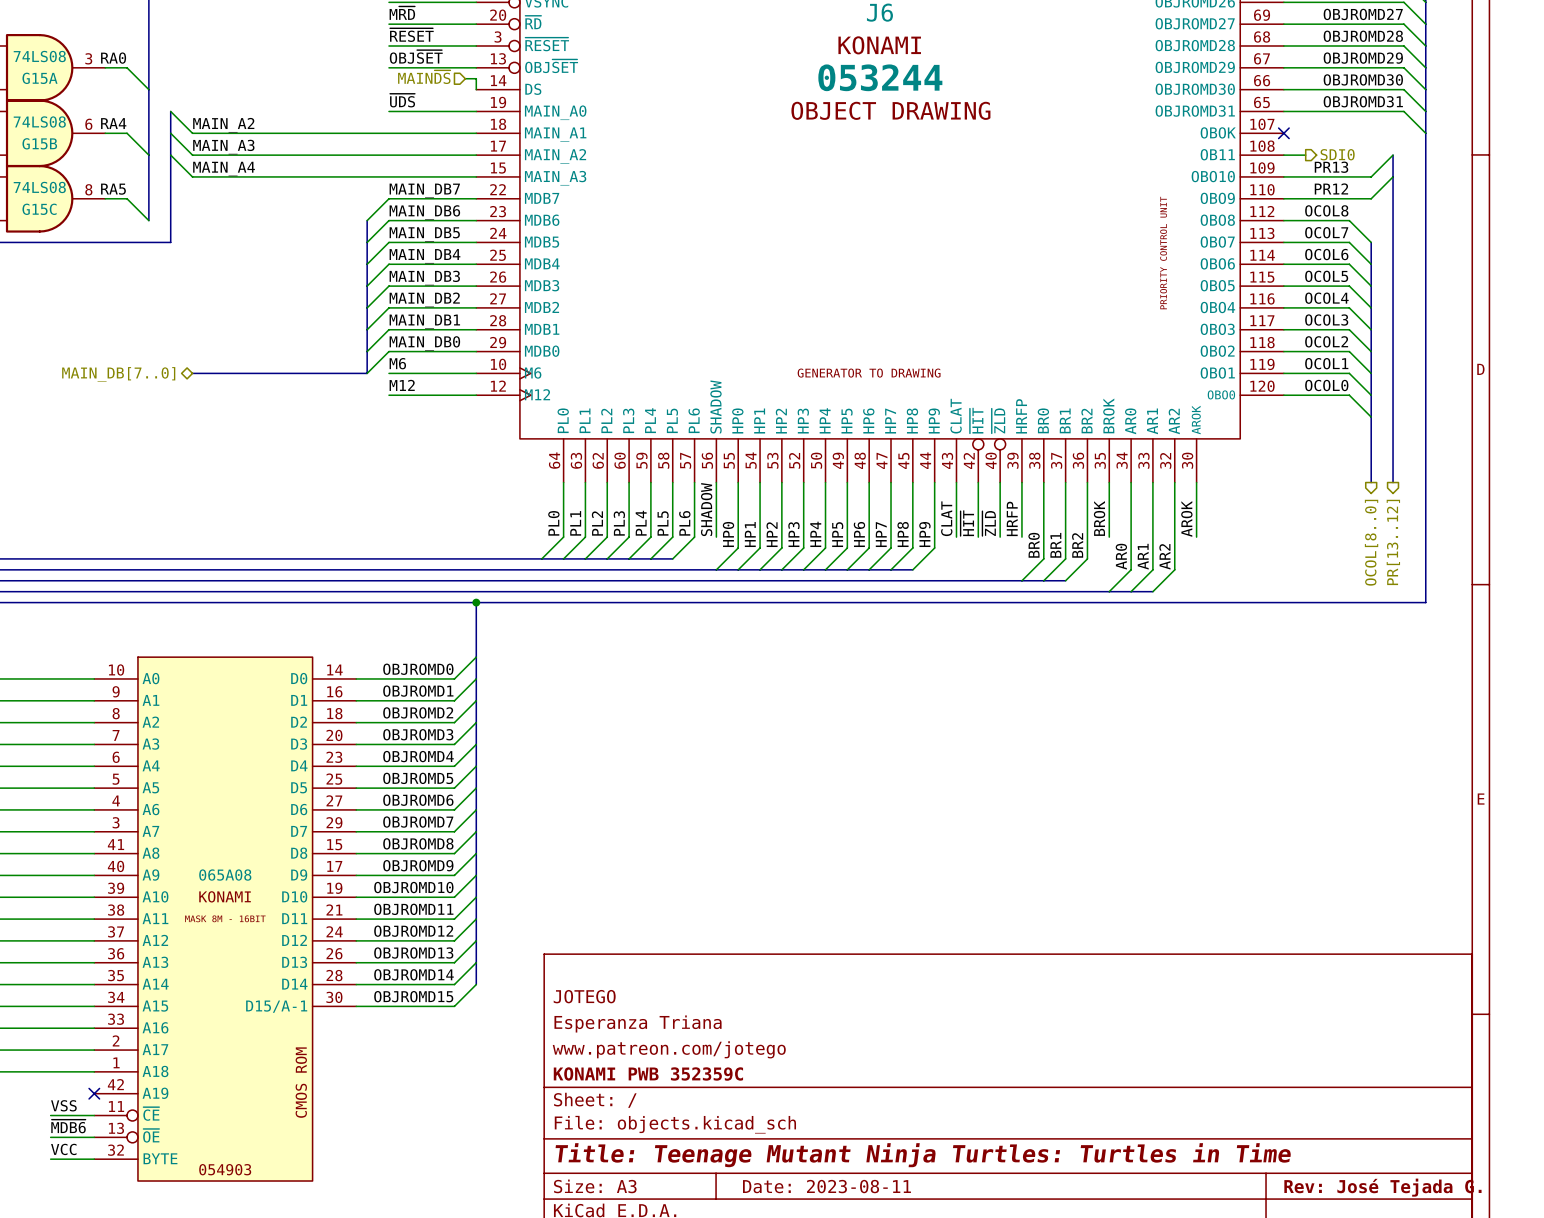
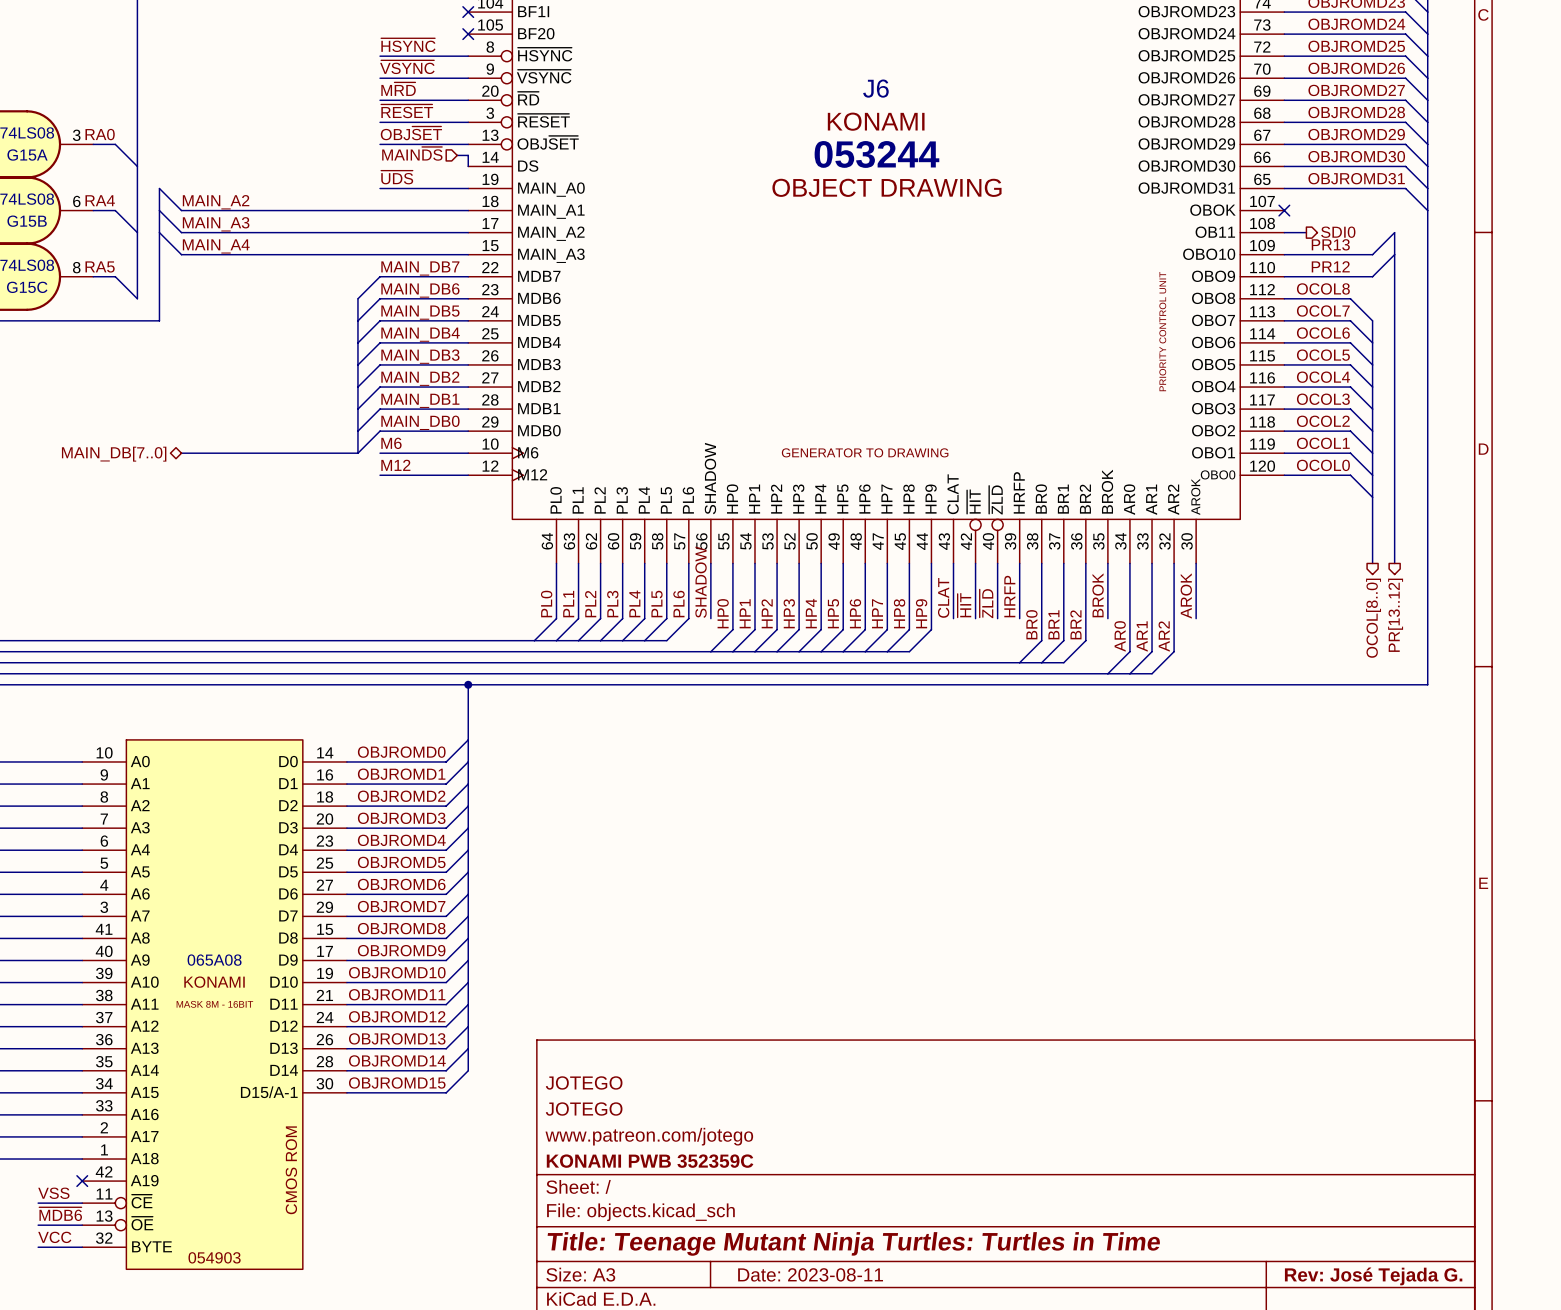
title block: Esperanza Triana (638, 1023) -> JOTEGO (584, 1109)

